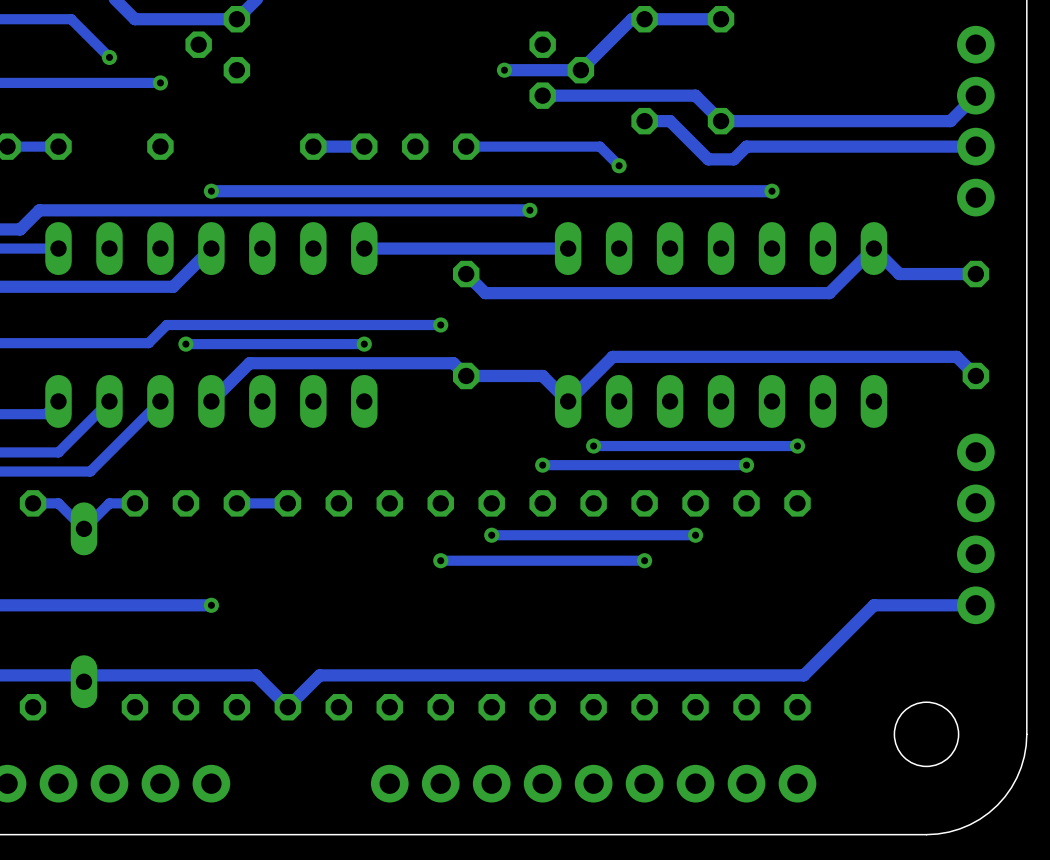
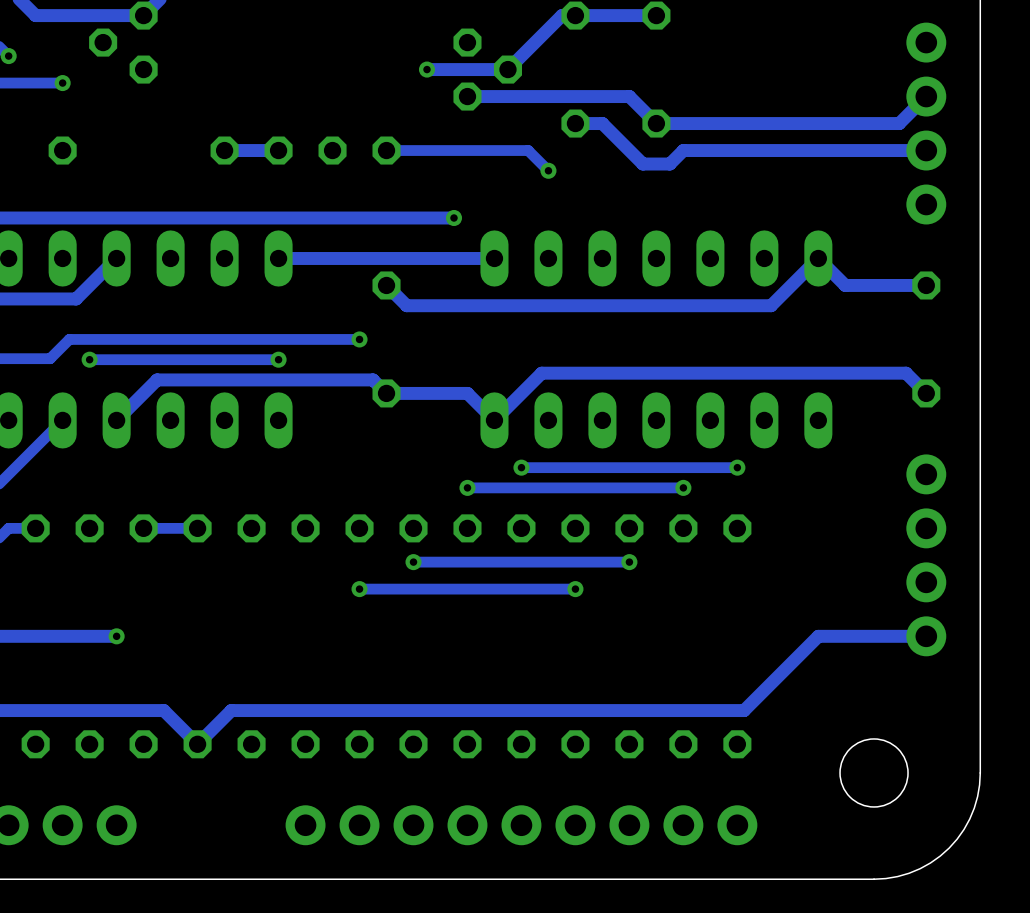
via: (211, 191) -> none
track: (772, 191) (211, 191) -> none
via: (772, 191) -> none

